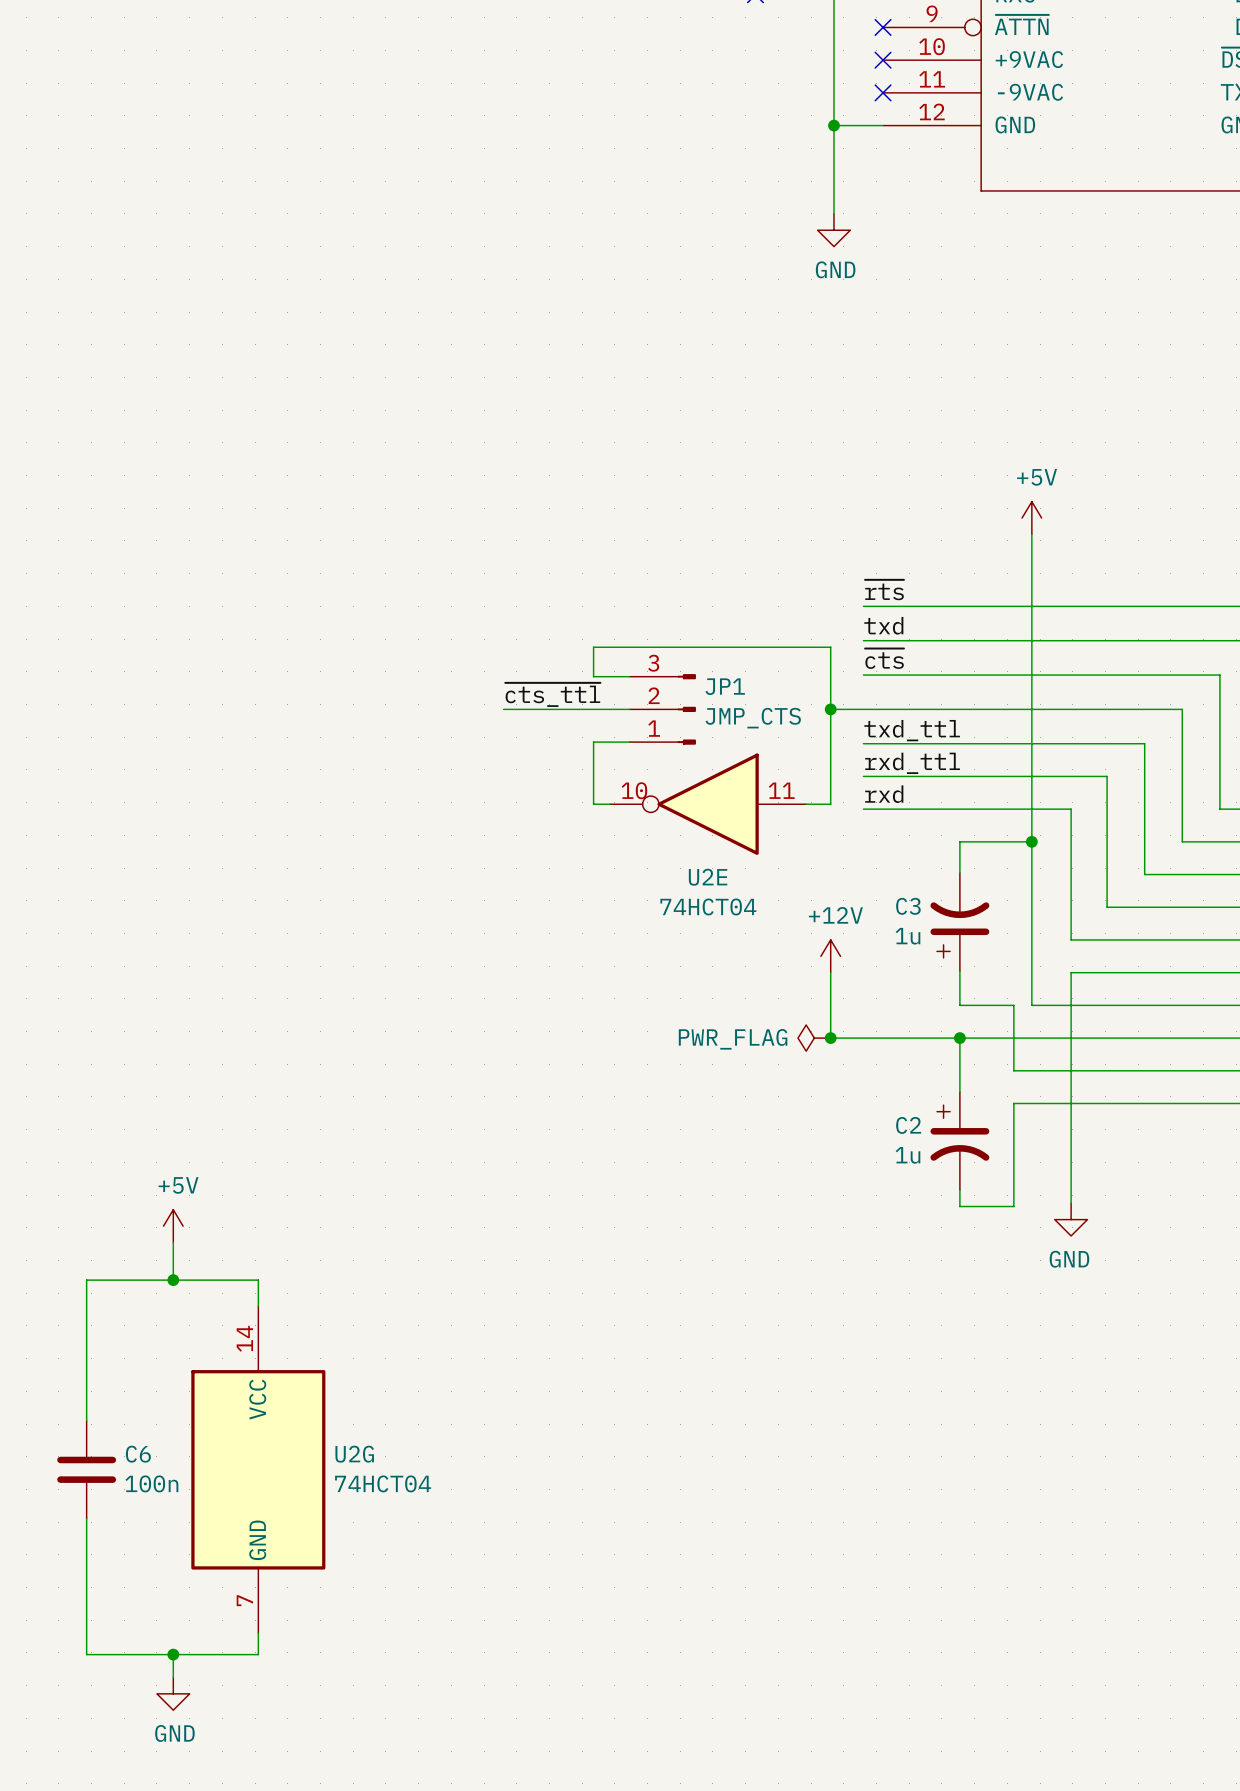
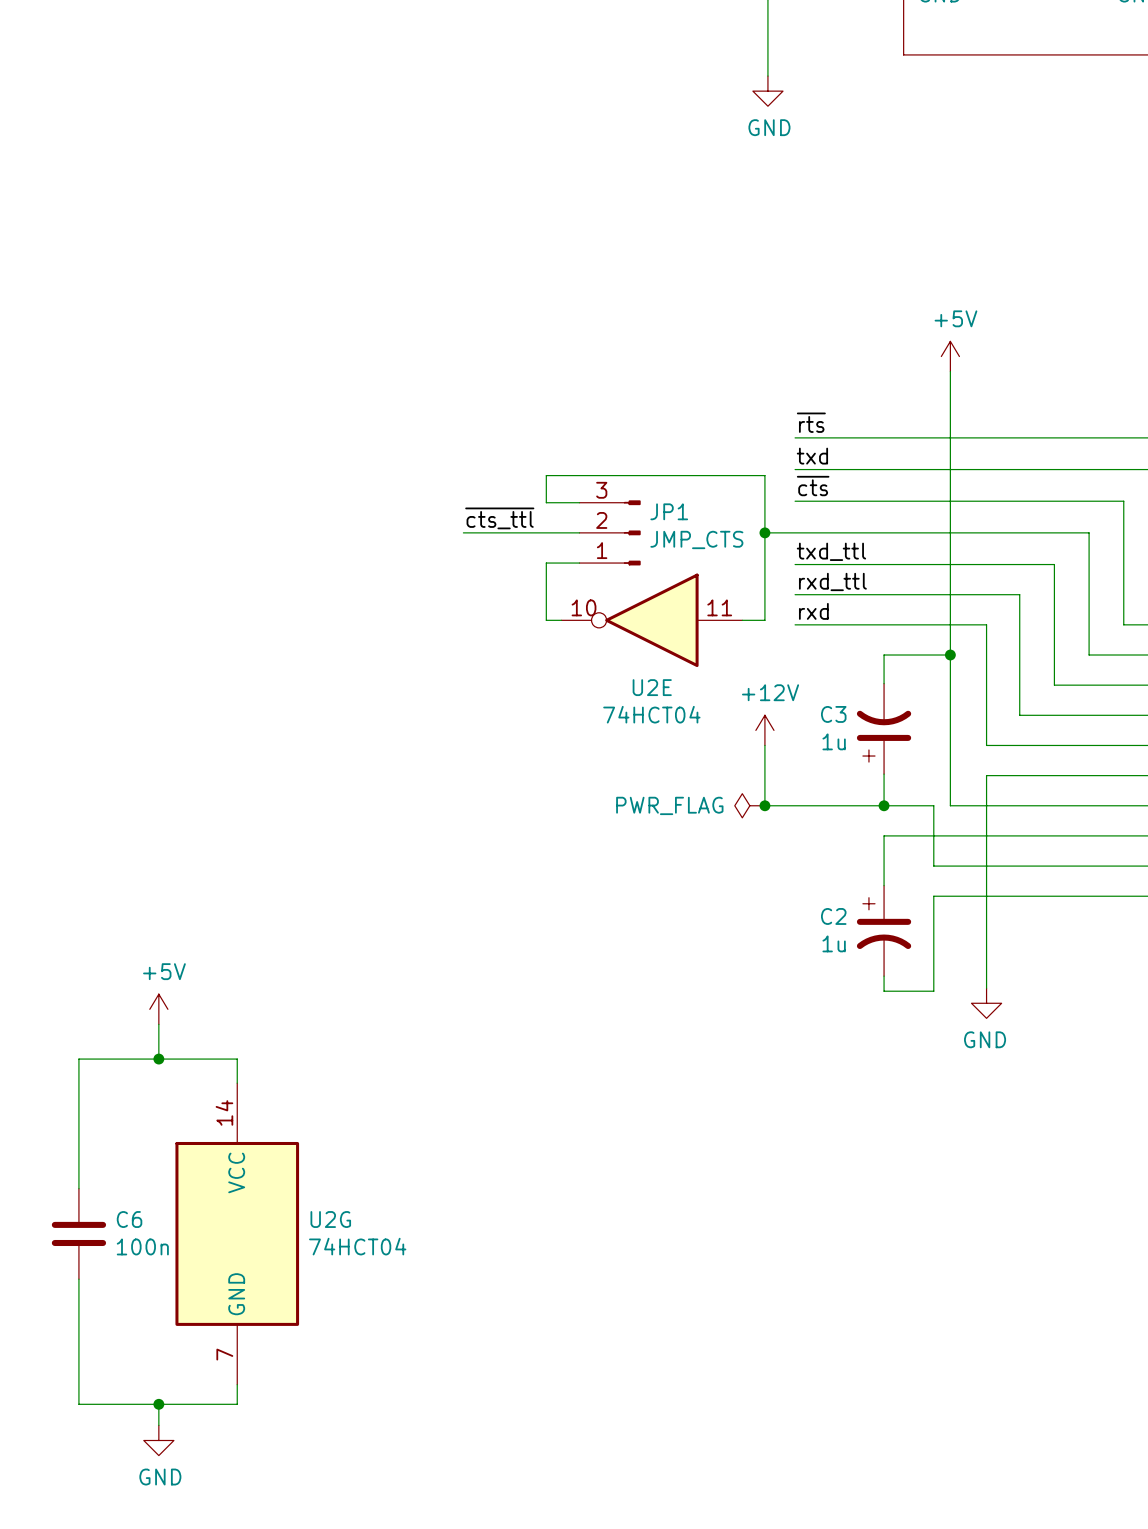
power symbol position: +12V (830, 956) -> +12V (764, 730)
wire: (830, 1005) (830, 1038) (959, 1038) -> (764, 805) (884, 805)
power symbol position: PWR_FLAG (814, 1038) -> PWR_FLAG (749, 805)
junction position: (830, 1038) -> (764, 805)
junction position: (959, 1038) -> (884, 805)

